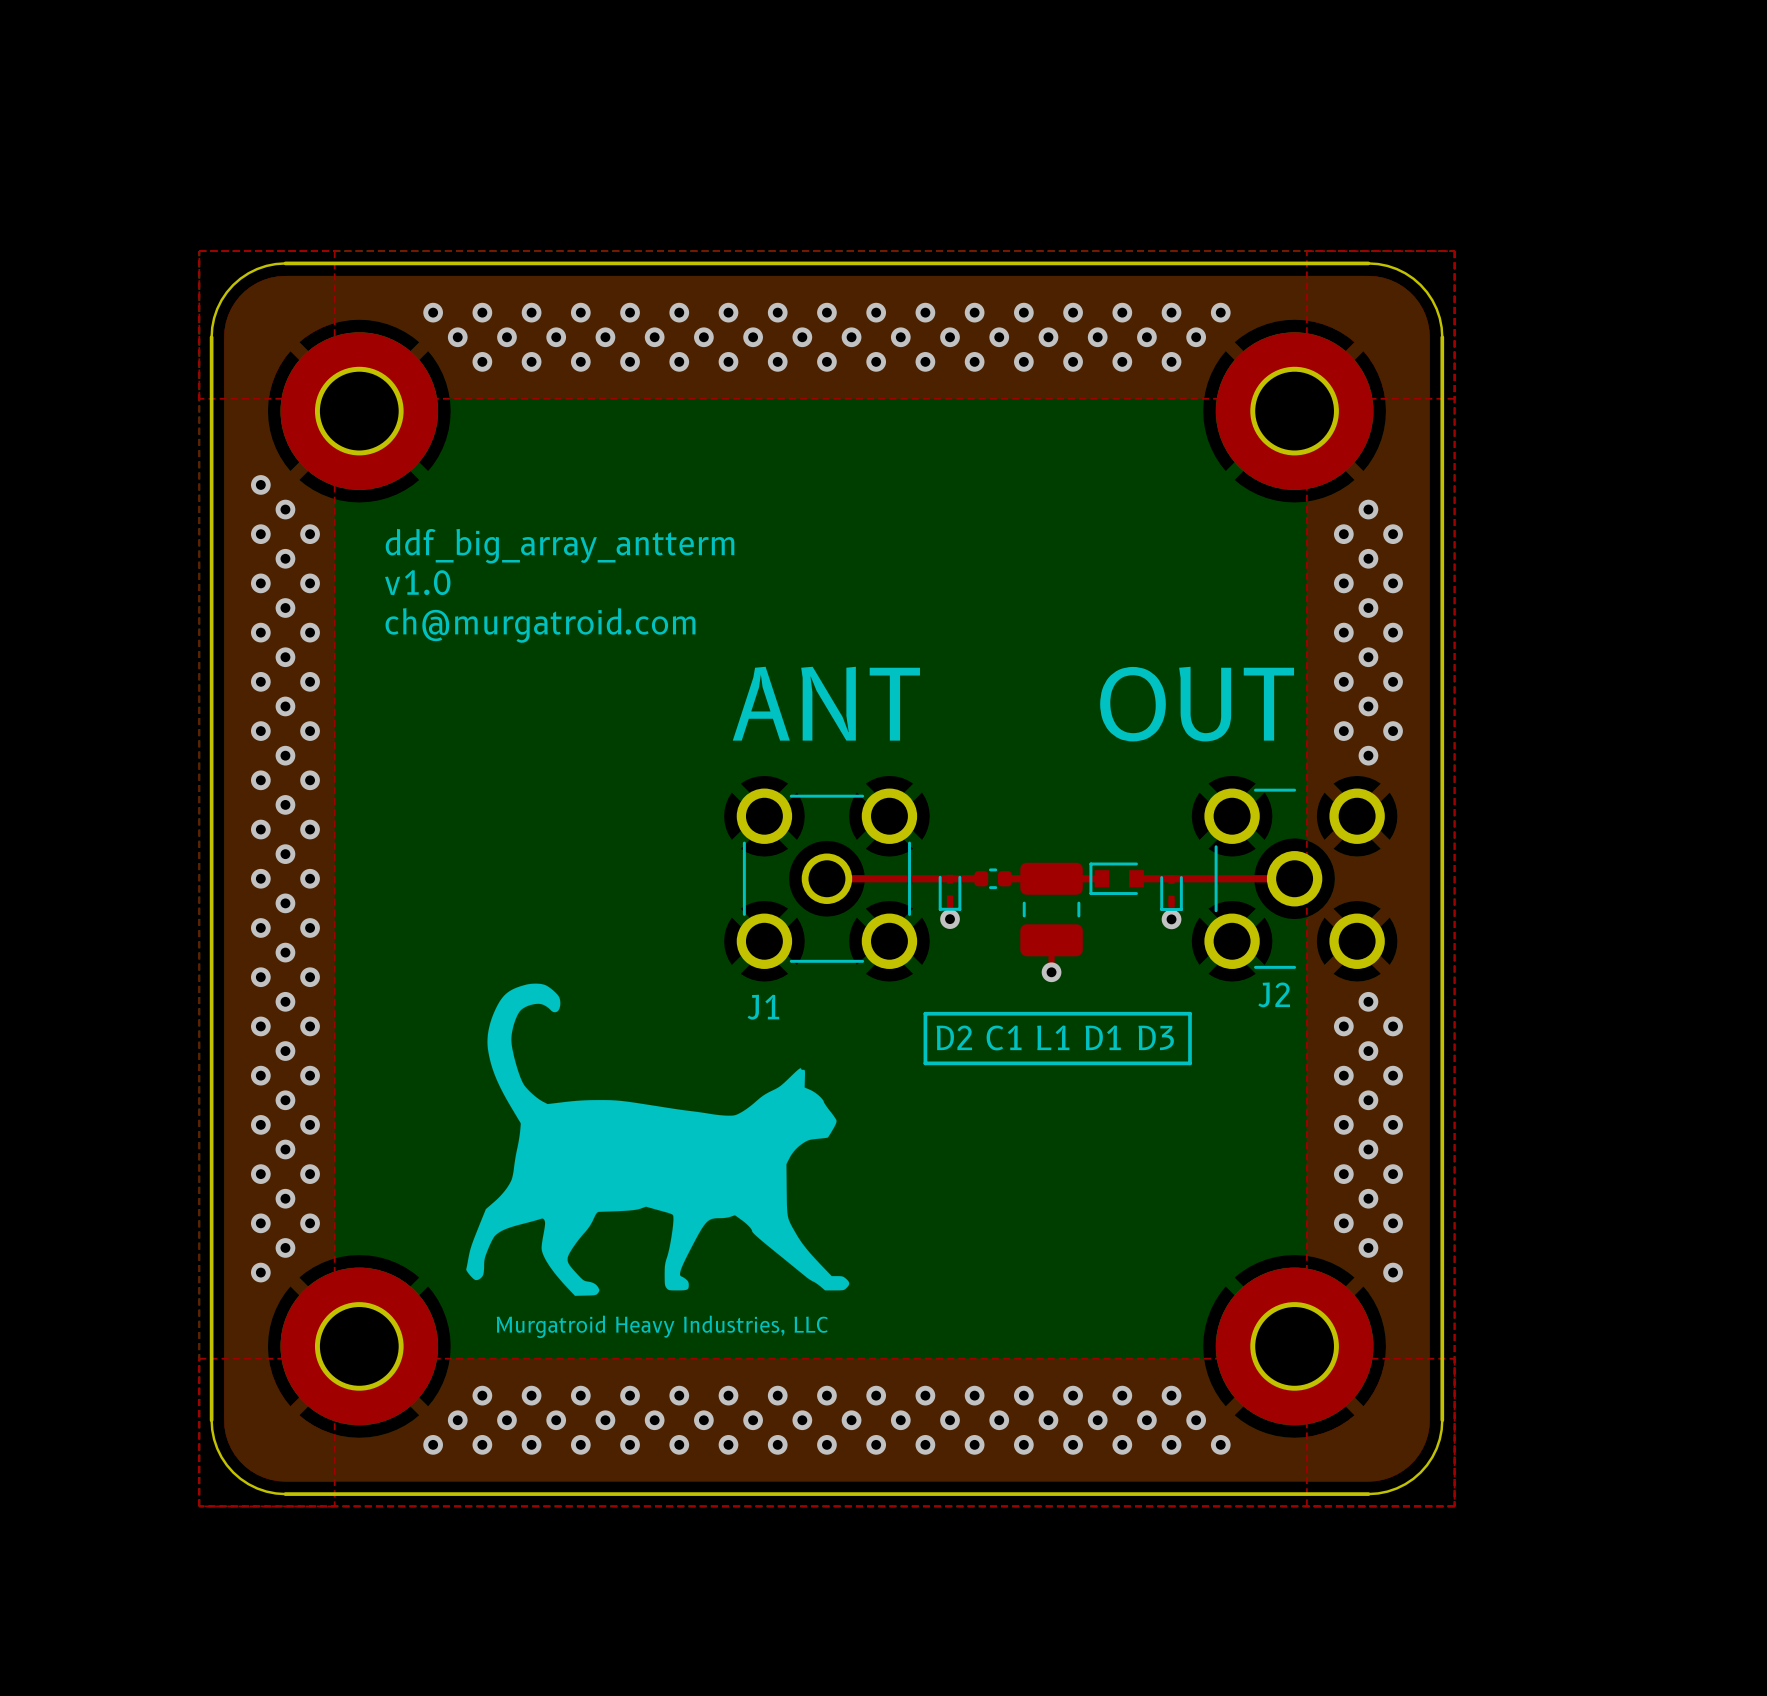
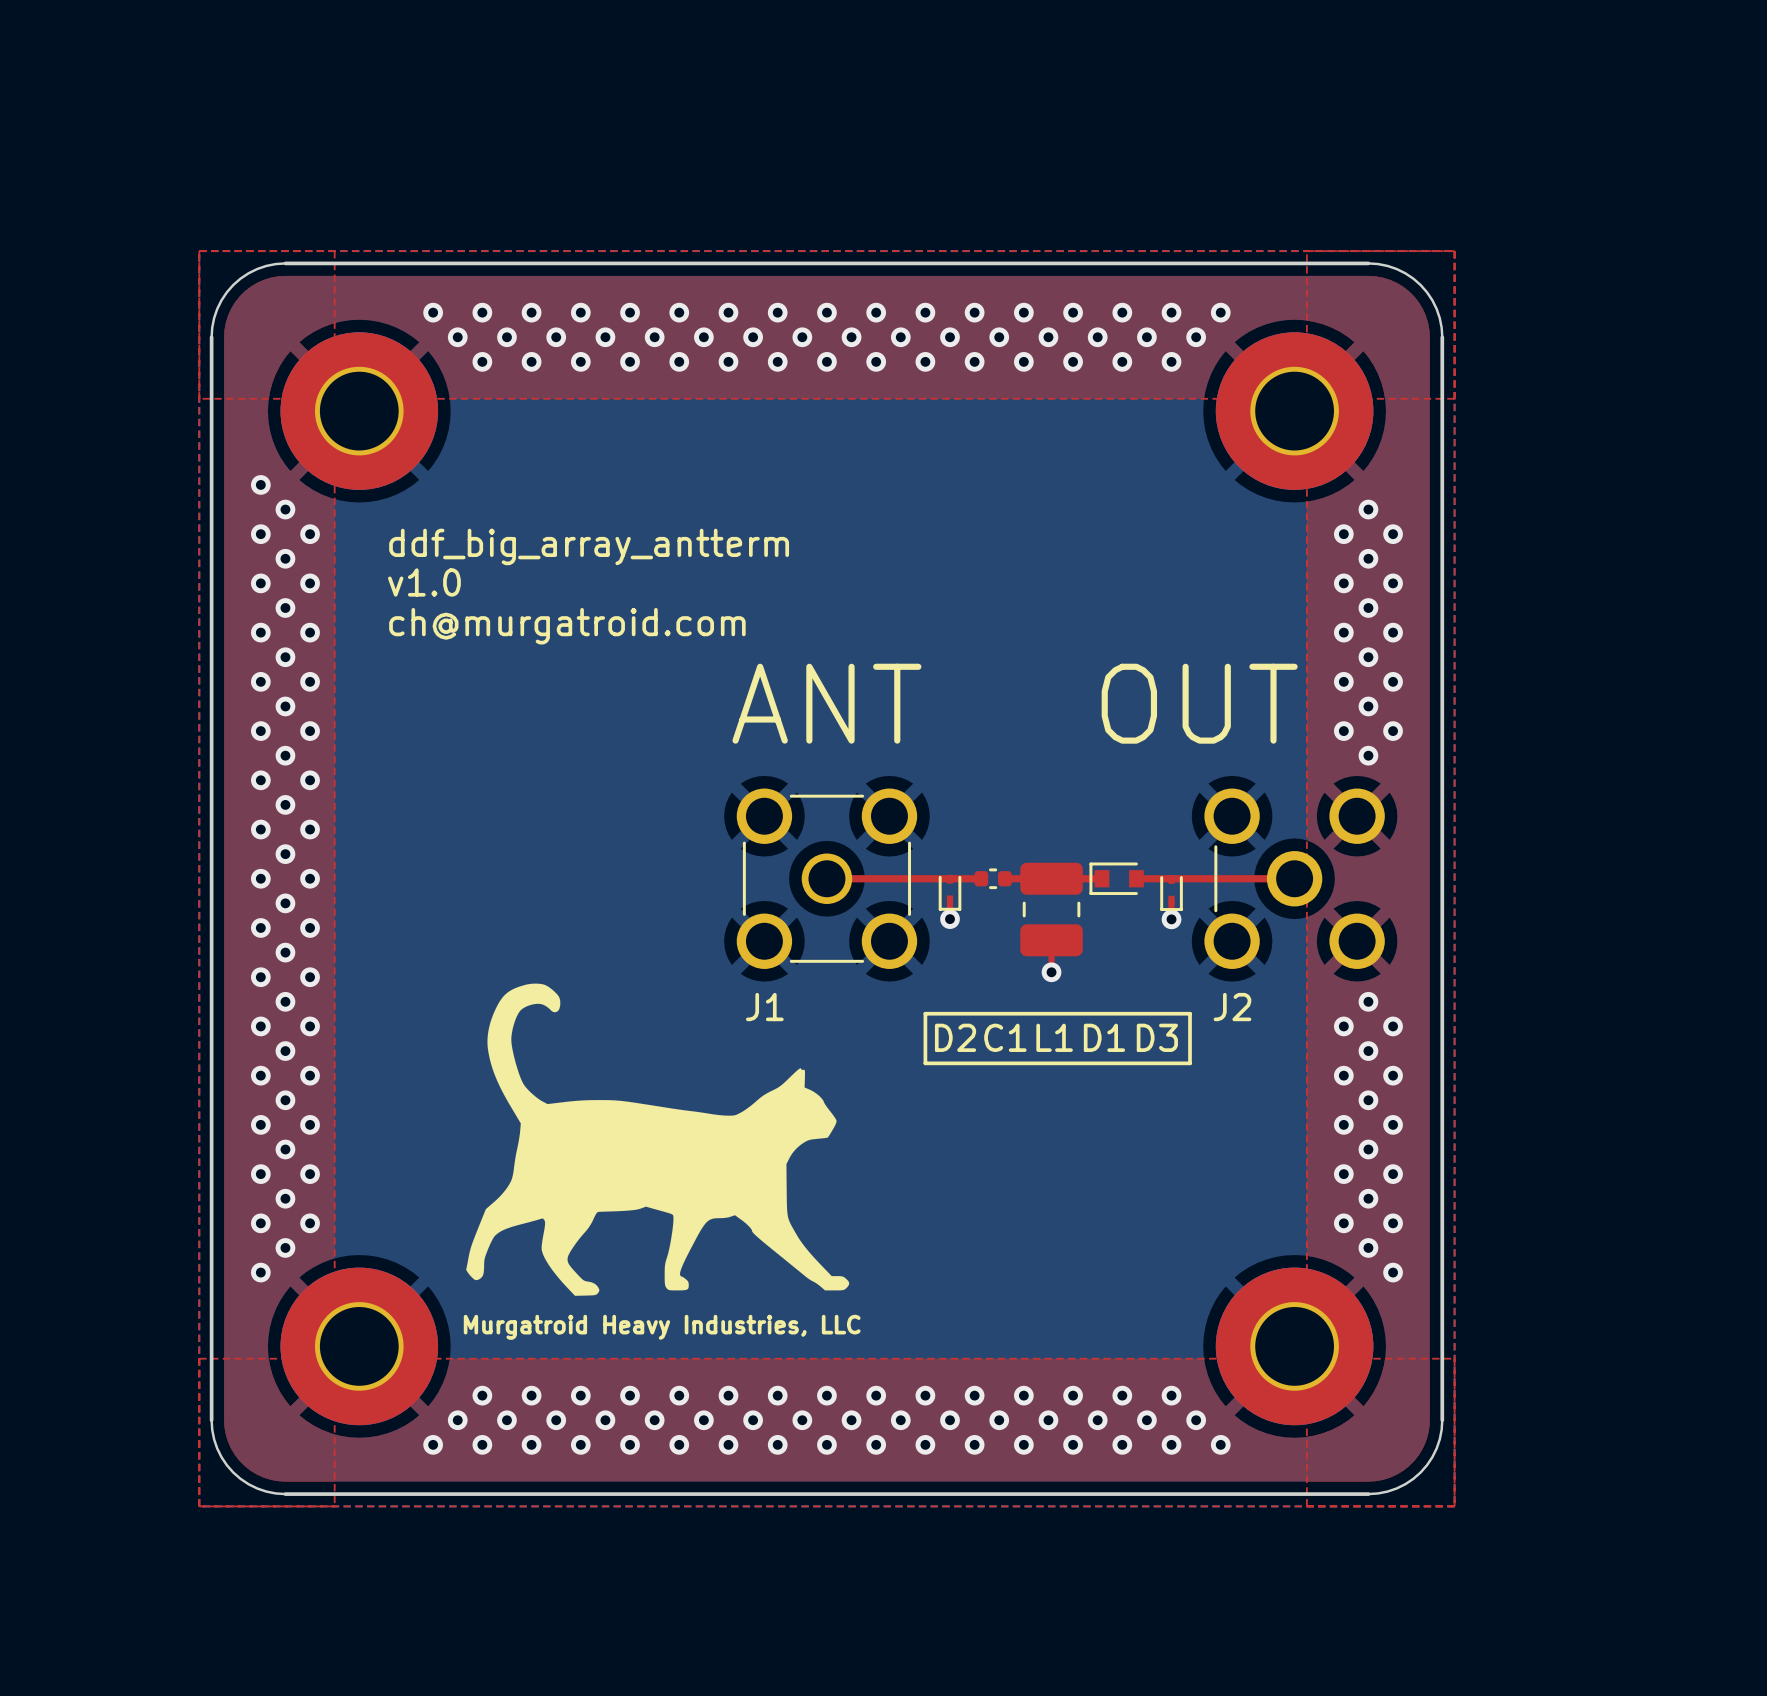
J2 footprint: [1204, 788, 1385, 969] -> [1204, 788, 1385, 969]

